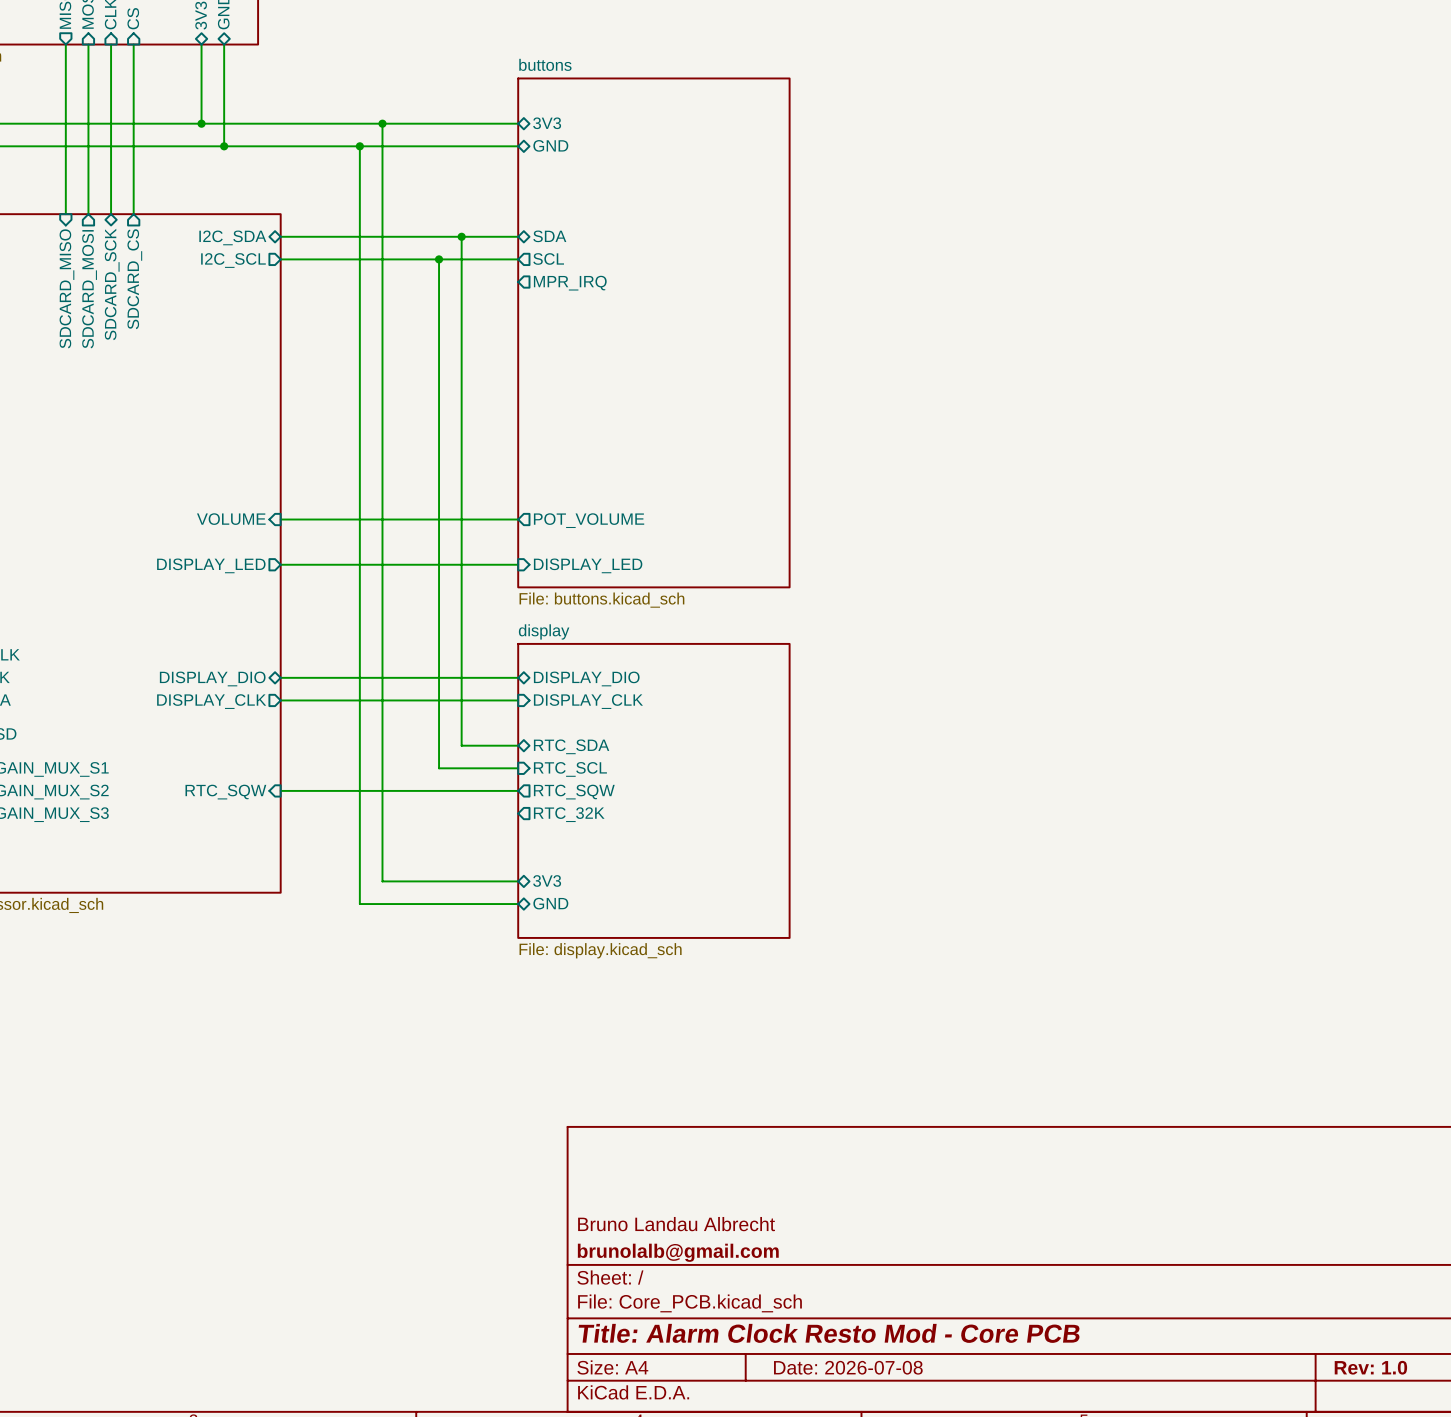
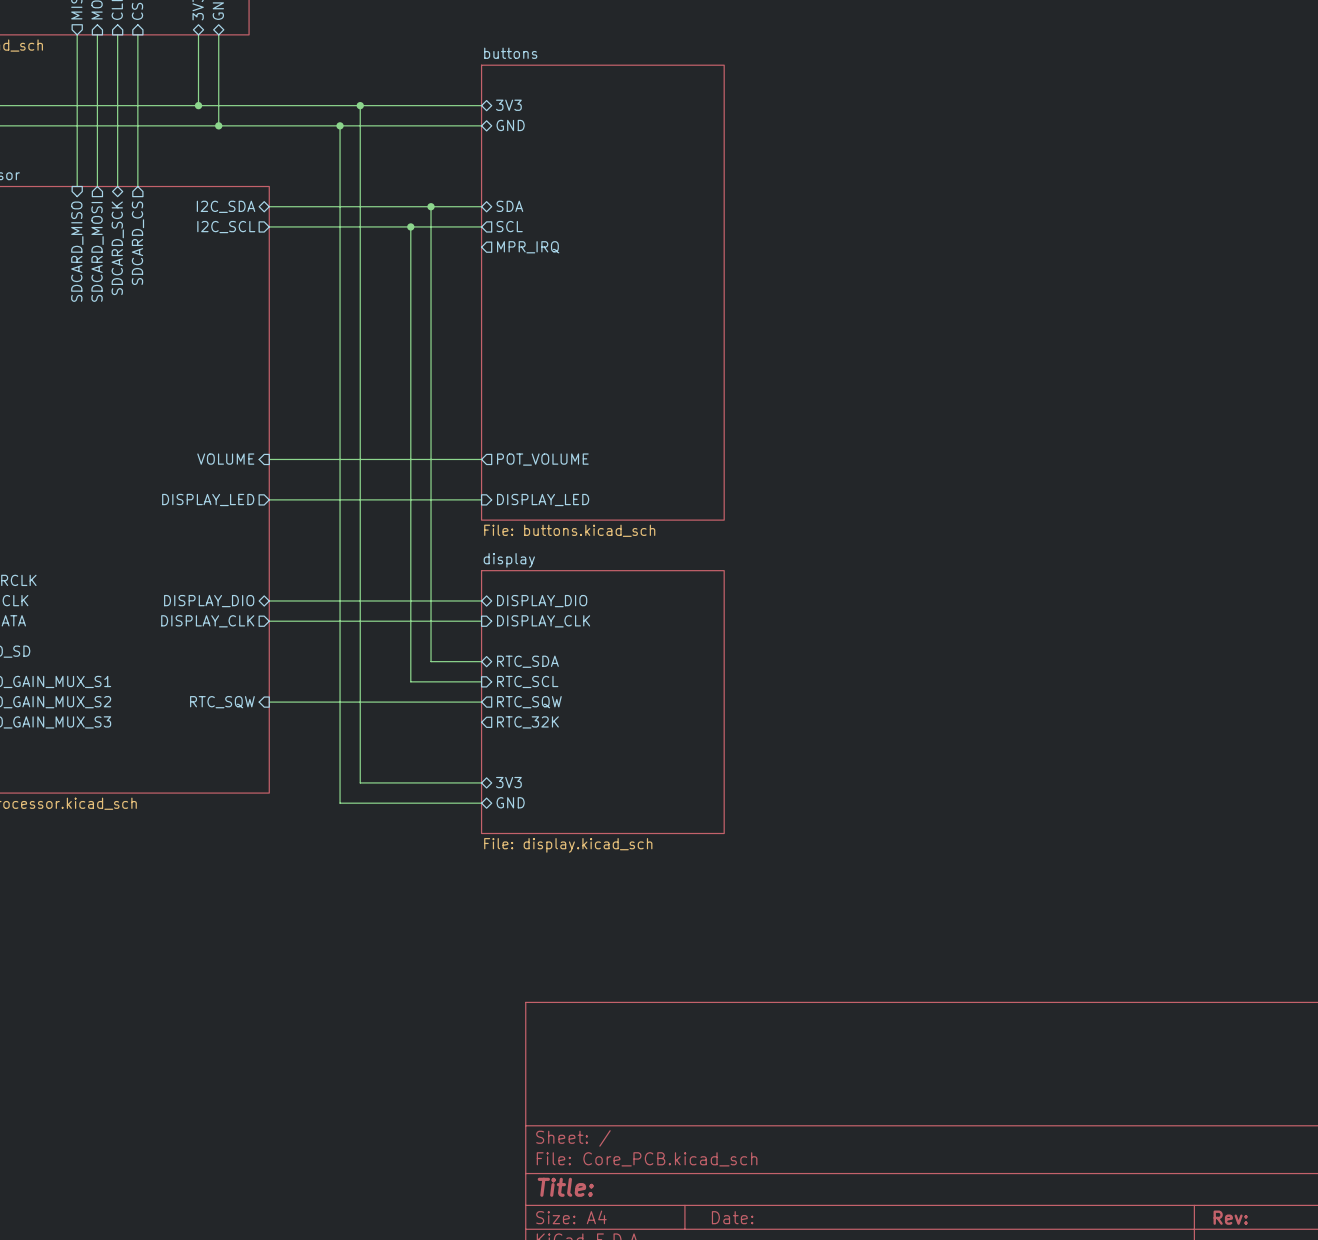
title block: Bruno Landau Albrecht (676, 1224) -> none
title block: brunolalb@gmail.com (678, 1252) -> none
title block: Title: Alarm Clock Resto Mod - Core PCB (829, 1333) -> Title: (565, 1187)
title block: Date: 2026-07-08 (848, 1367) -> Date: (732, 1217)
title block: Rev: 1.0 (1370, 1367) -> Rev: (1230, 1217)

